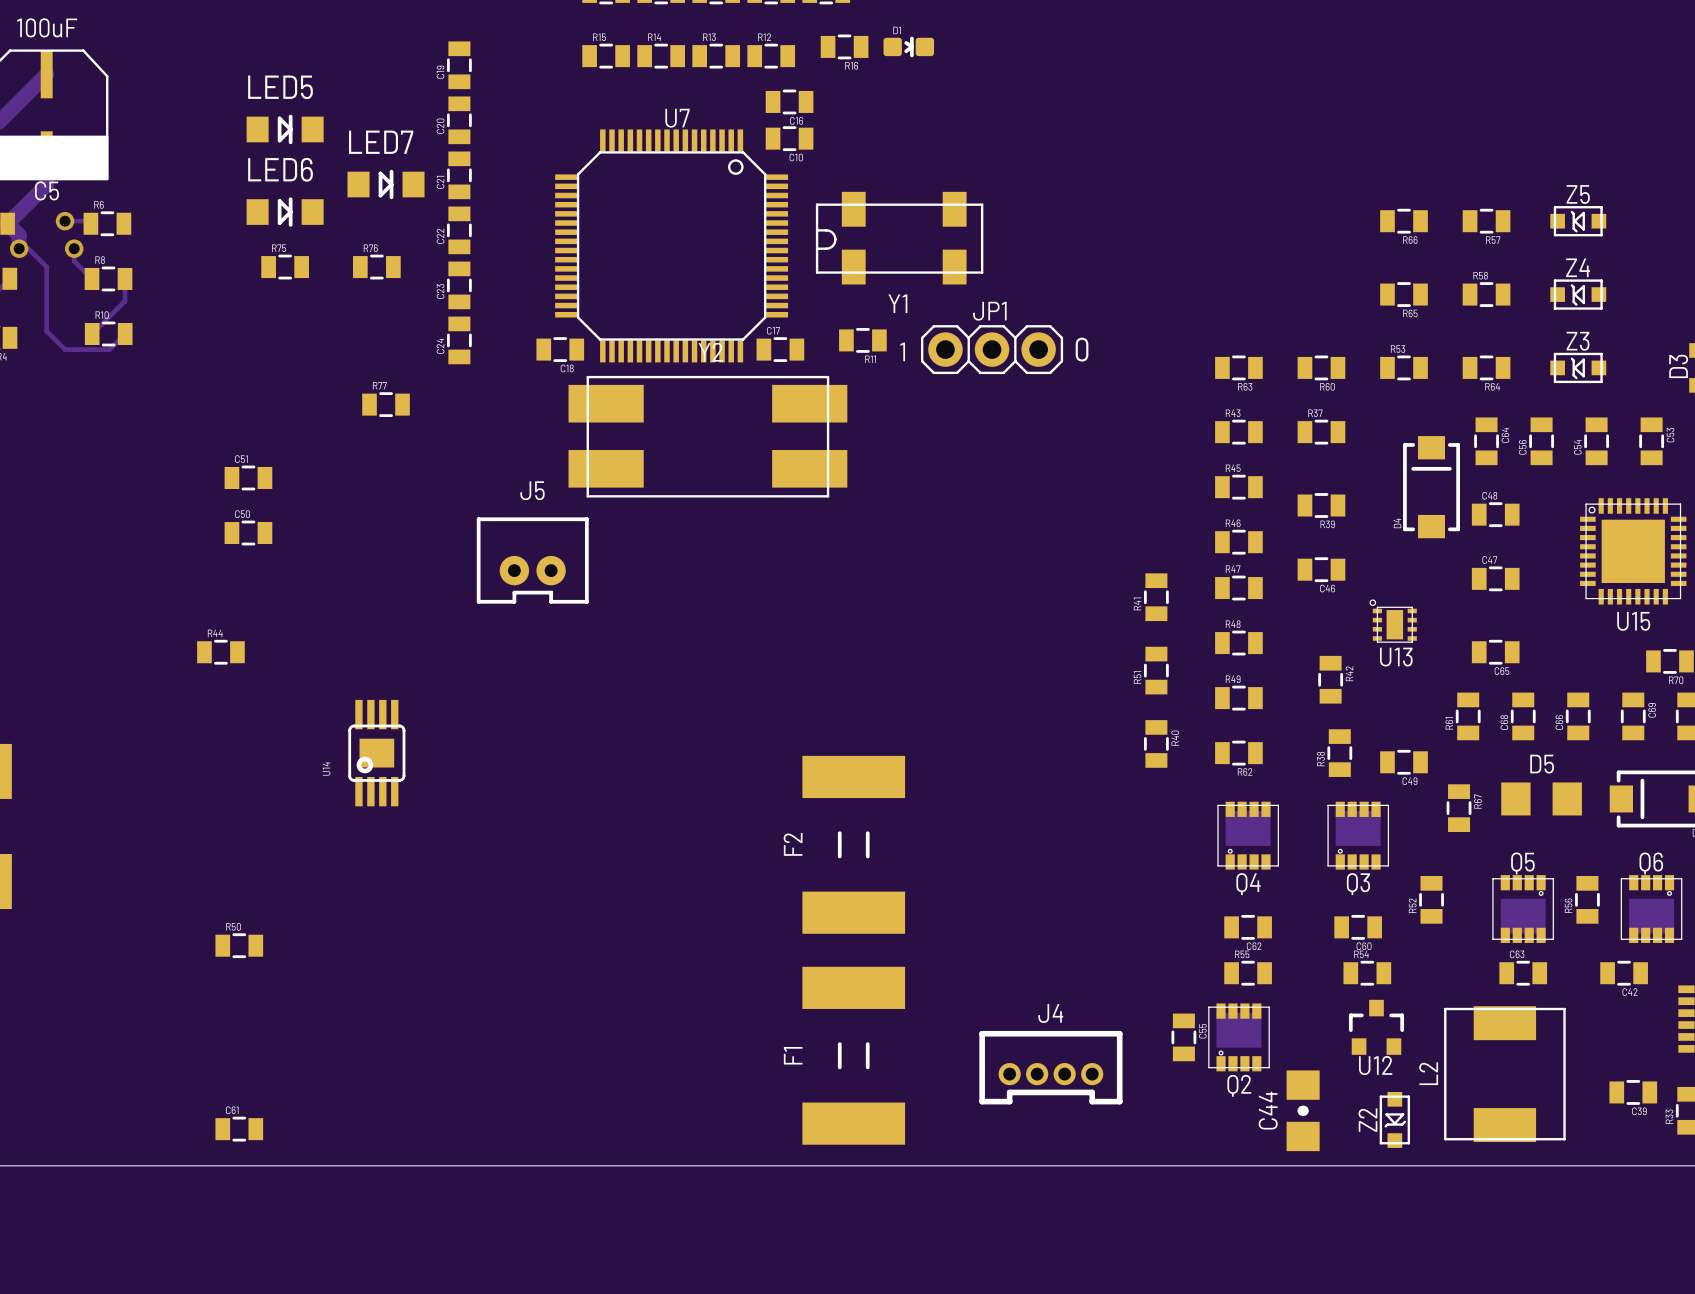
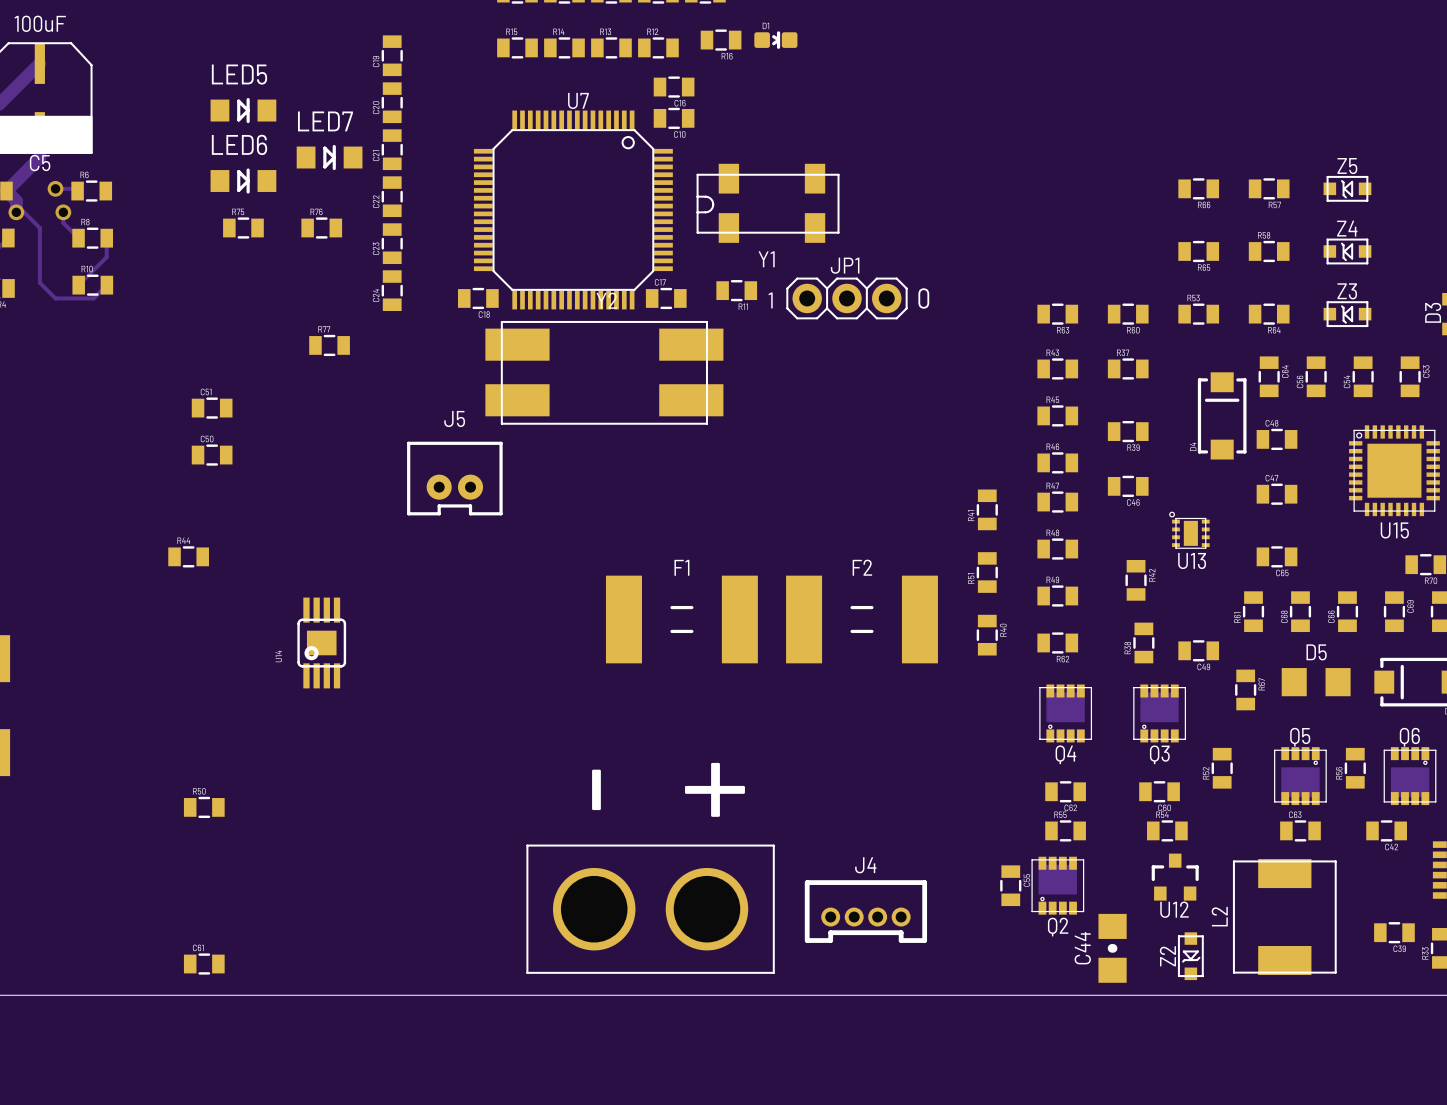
F2 rotation: 0° (853, 844) -> 90° clockwise (862, 619)
F2 position: (853, 844) -> (862, 619)
F1 rotation: 0° (853, 1055) -> 90° clockwise (681, 619)
F1 position: (853, 1055) -> (681, 619)
part: none -> (650, 909)
J4 position: (1050, 1067) -> (865, 911)

